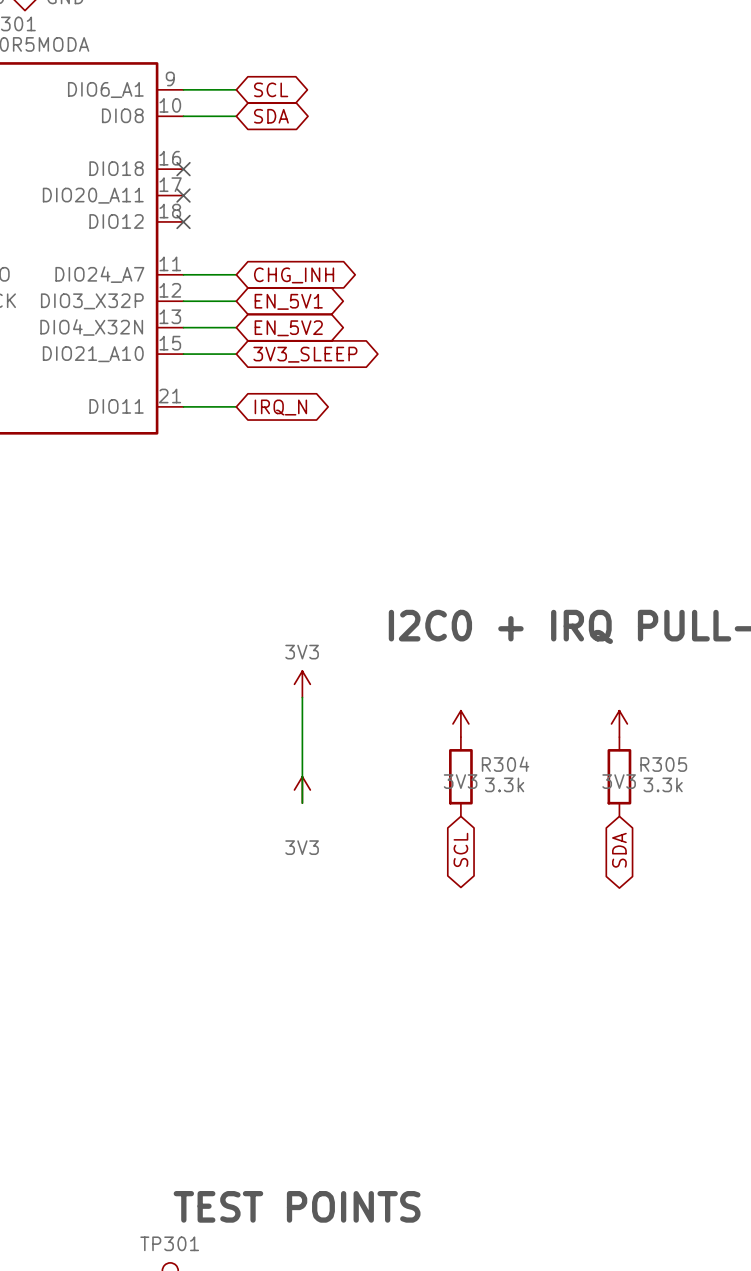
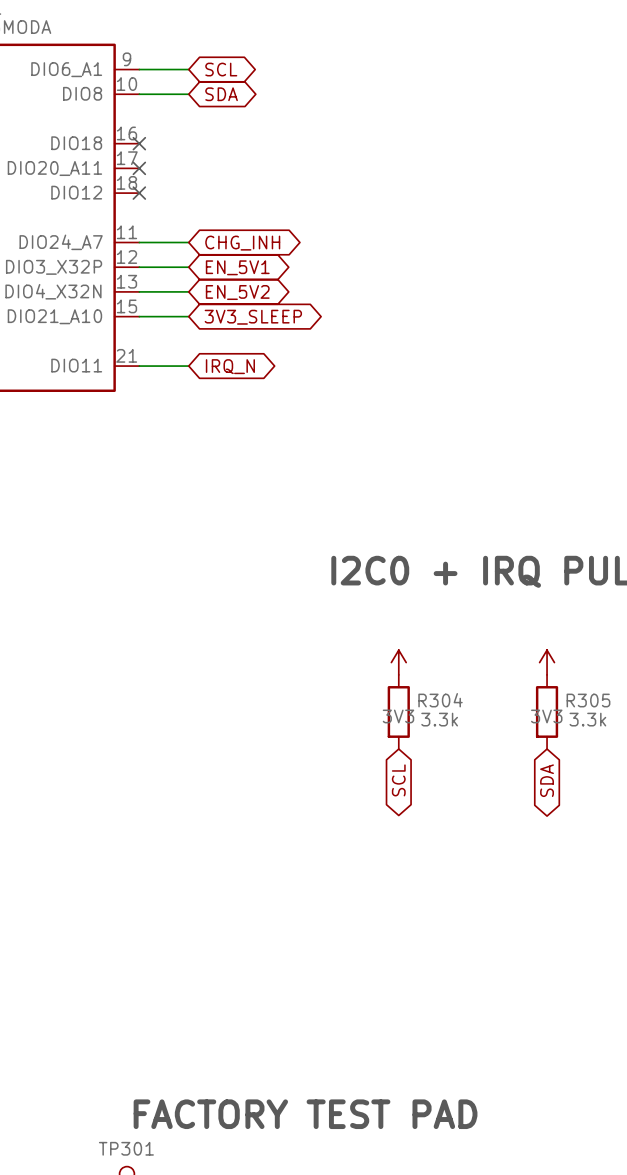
power symbol: 3V3 (302, 684) -> none
wire: (302, 697) (302, 803) -> none
power symbol: 3V3 (302, 789) -> none
text: TEST POINTS (297, 1206) -> FACTORY TEST PAD (305, 1114)

